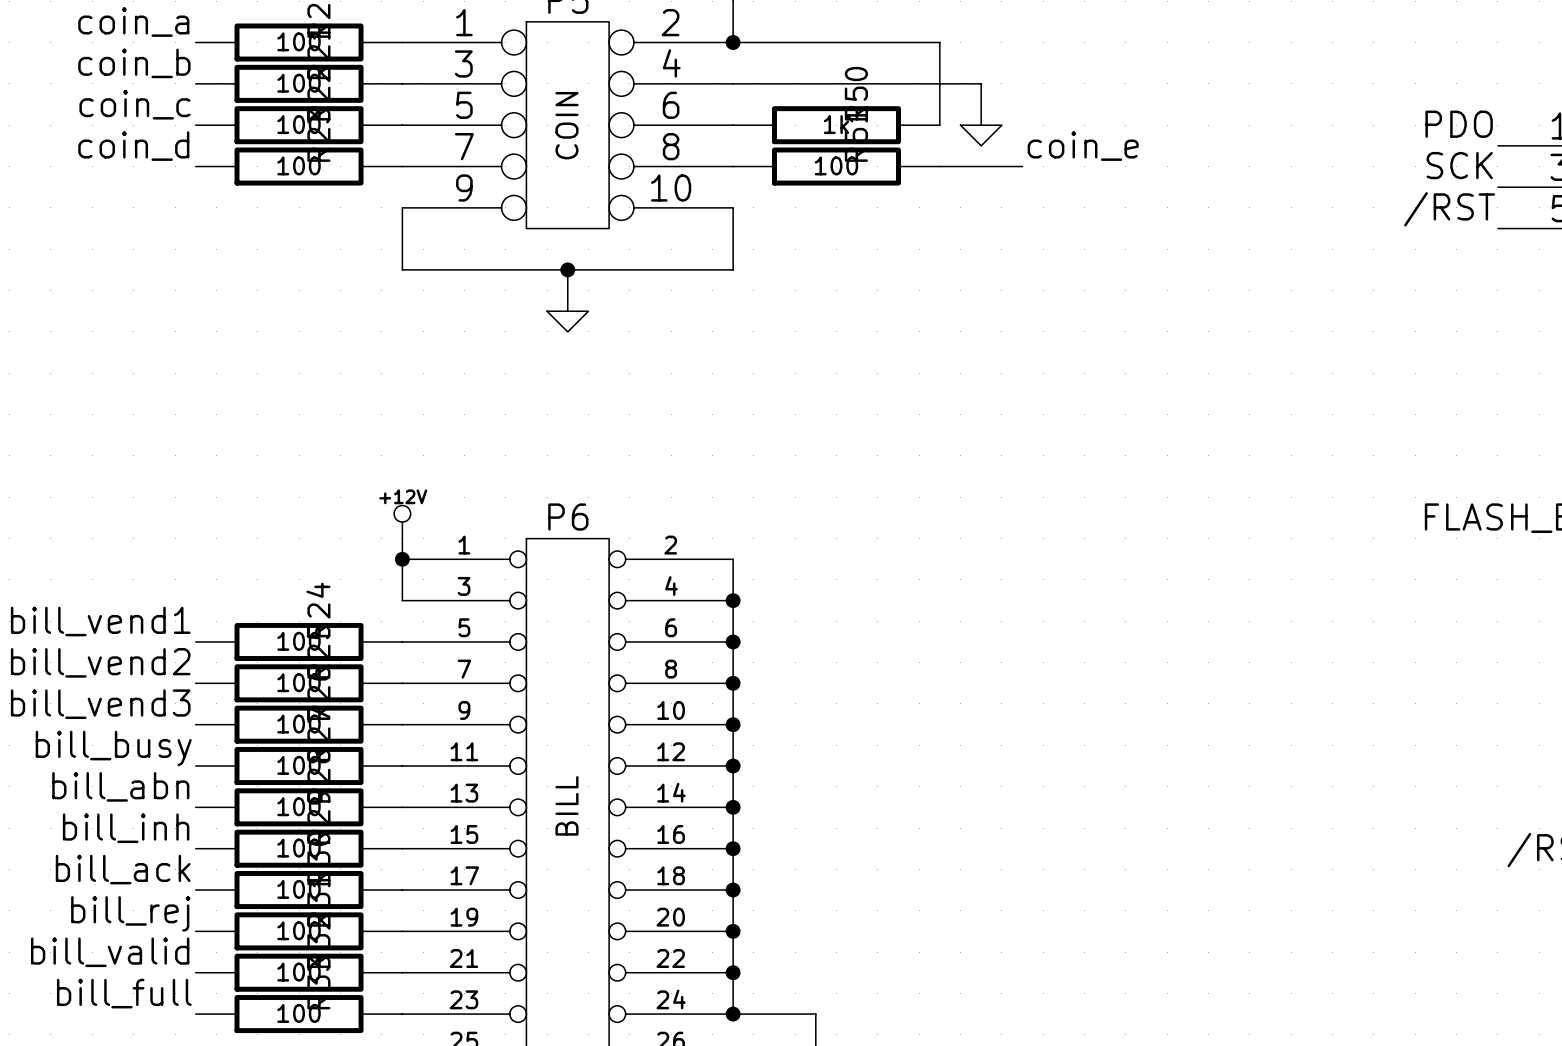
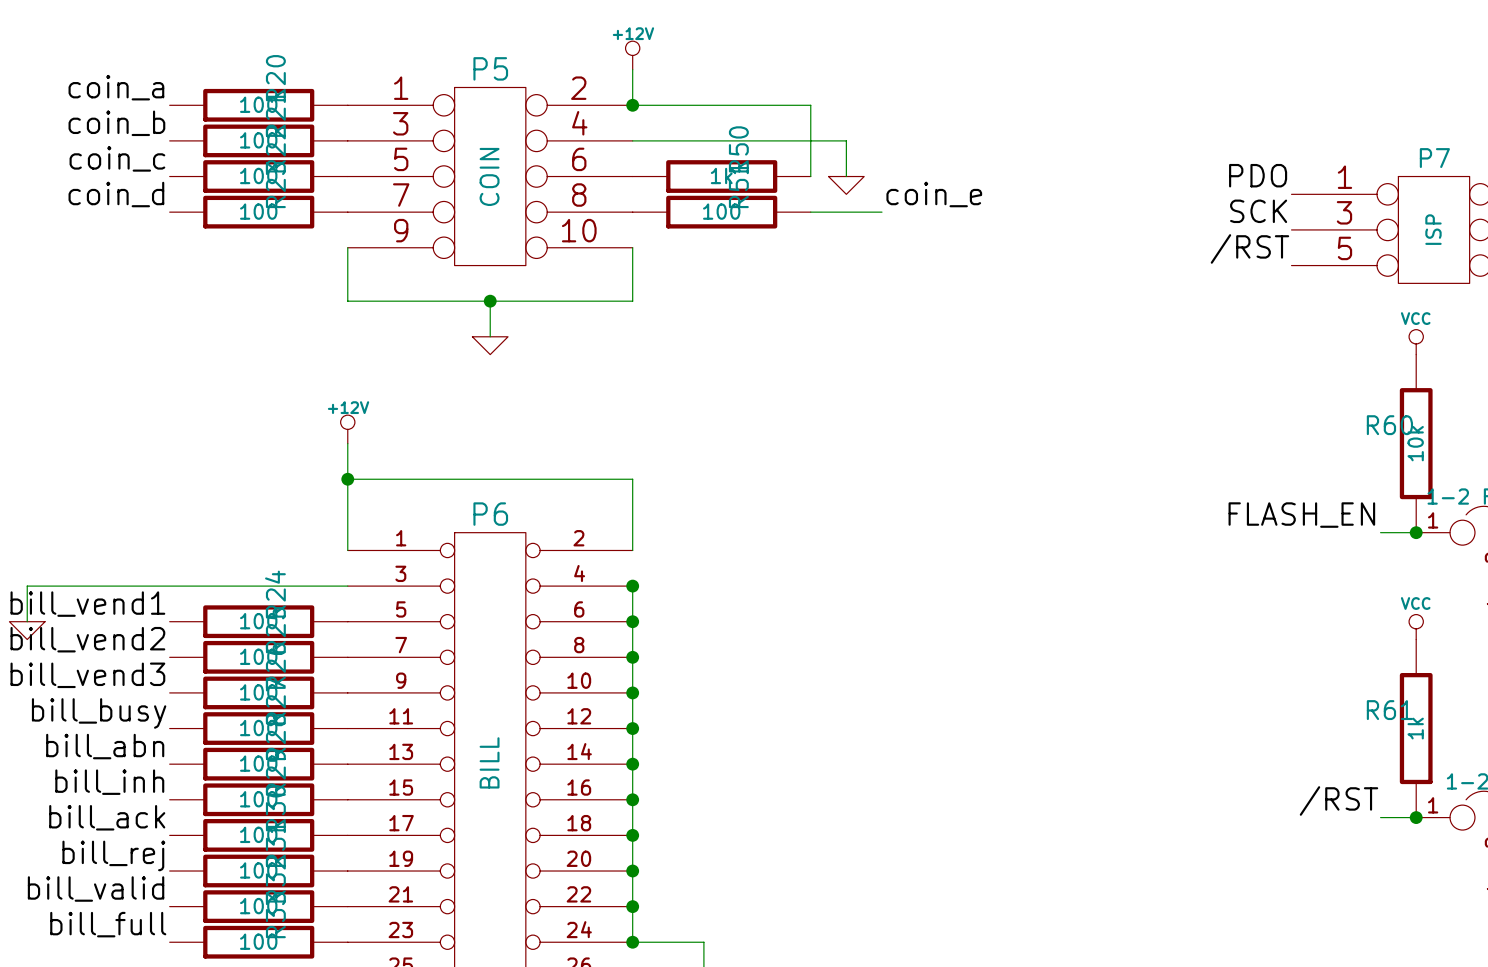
wire: none -> (347, 443) (347, 532)
power symbol position: +12V (402, 522) -> +12V (347, 429)
wire: (402, 559) (402, 600) -> (27, 621) (27, 586) (347, 586)
junction position: (402, 559) -> (347, 479)
wire: (733, 559) (733, 600) -> (632, 550) (632, 479) (347, 479)
power symbol: none -> (27, 630)

